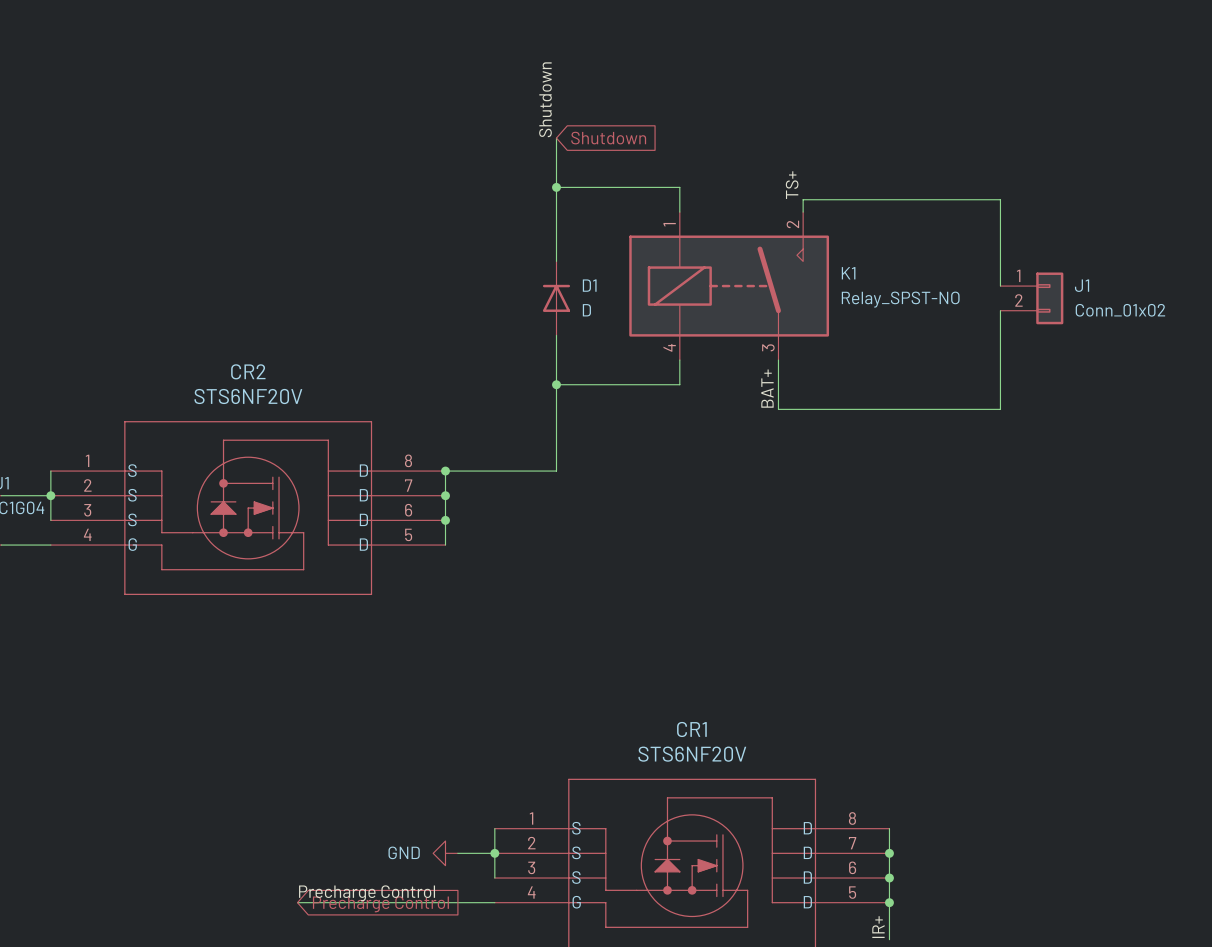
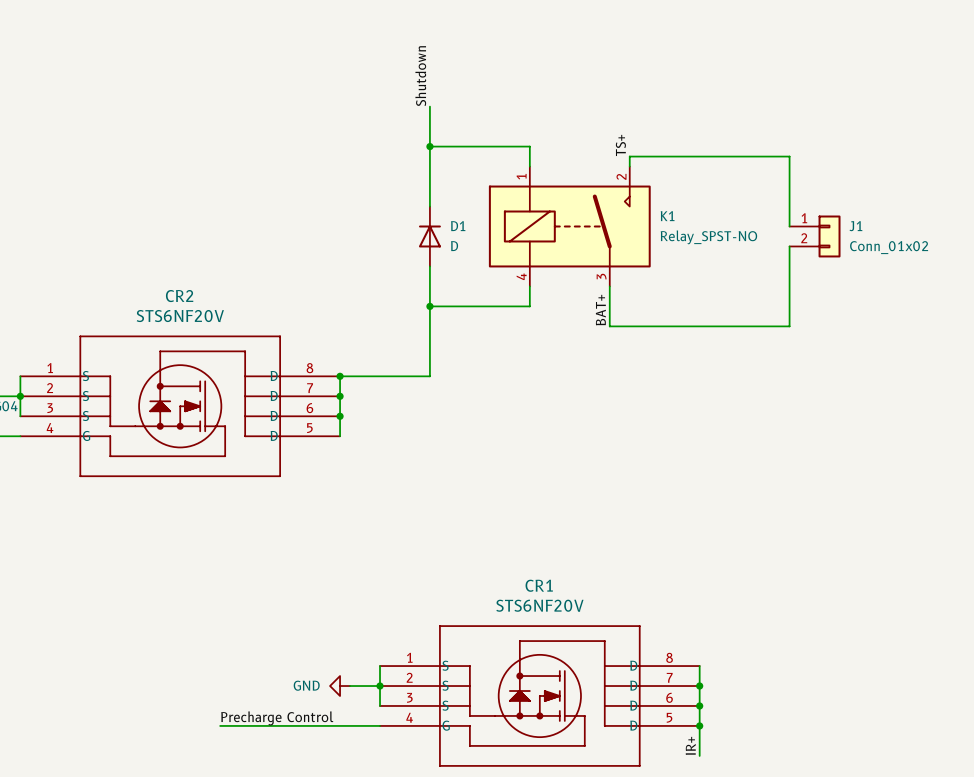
global label: Shutdown (608, 138) -> none
global label: Precharge Control (380, 904) -> none

